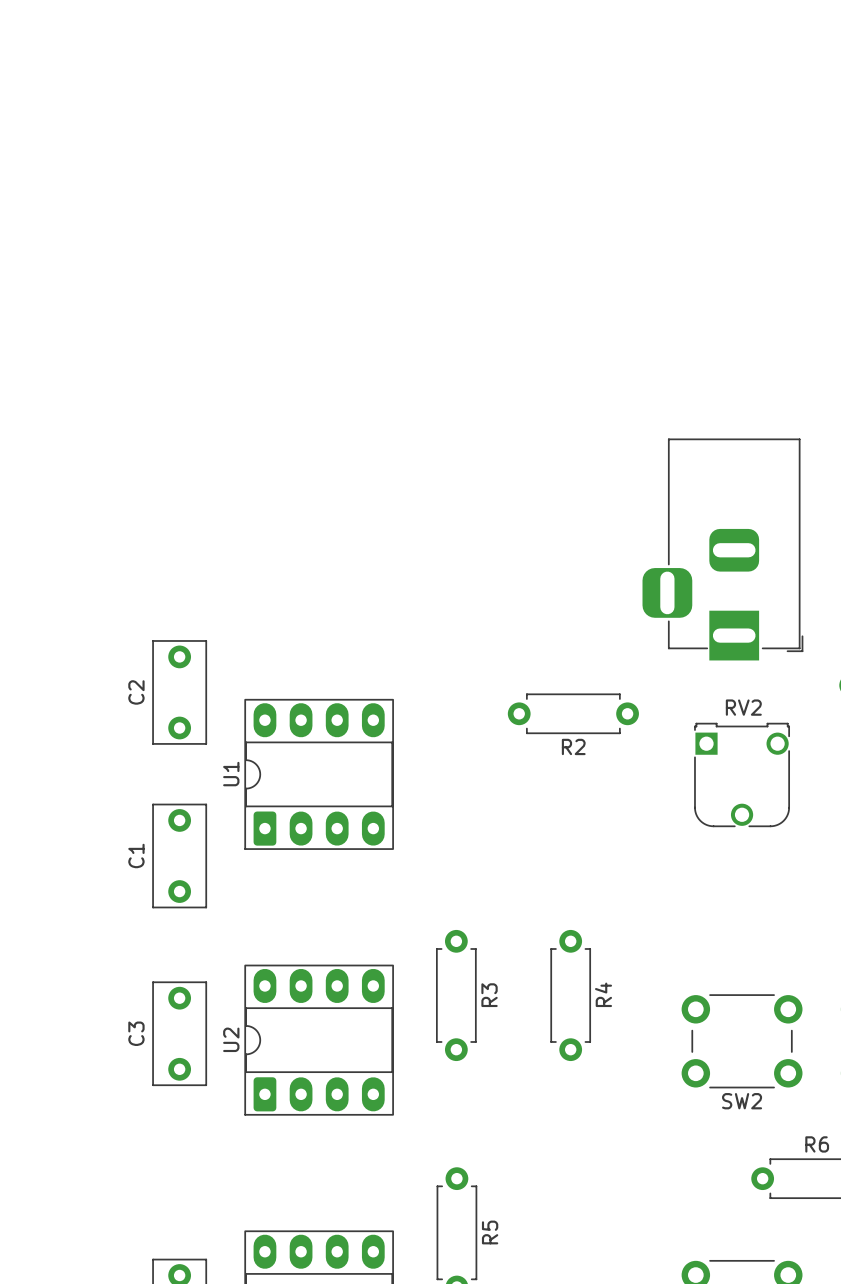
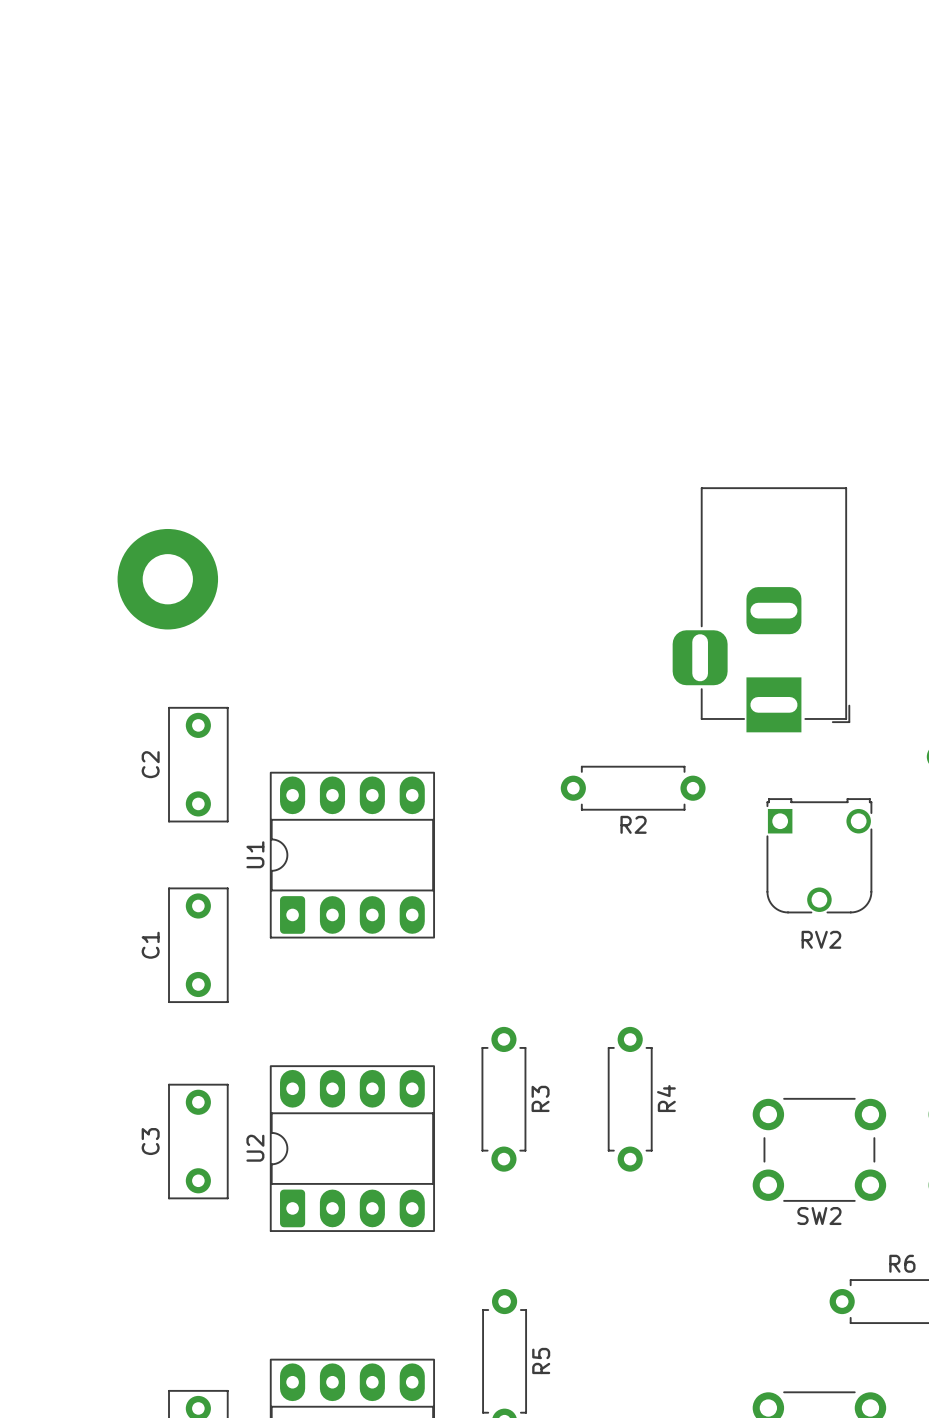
part: none -> (167, 579)
part position: (722, 549) -> (761, 609)
RV2 name position: RV2 (743, 707) -> RV2 (821, 939)

